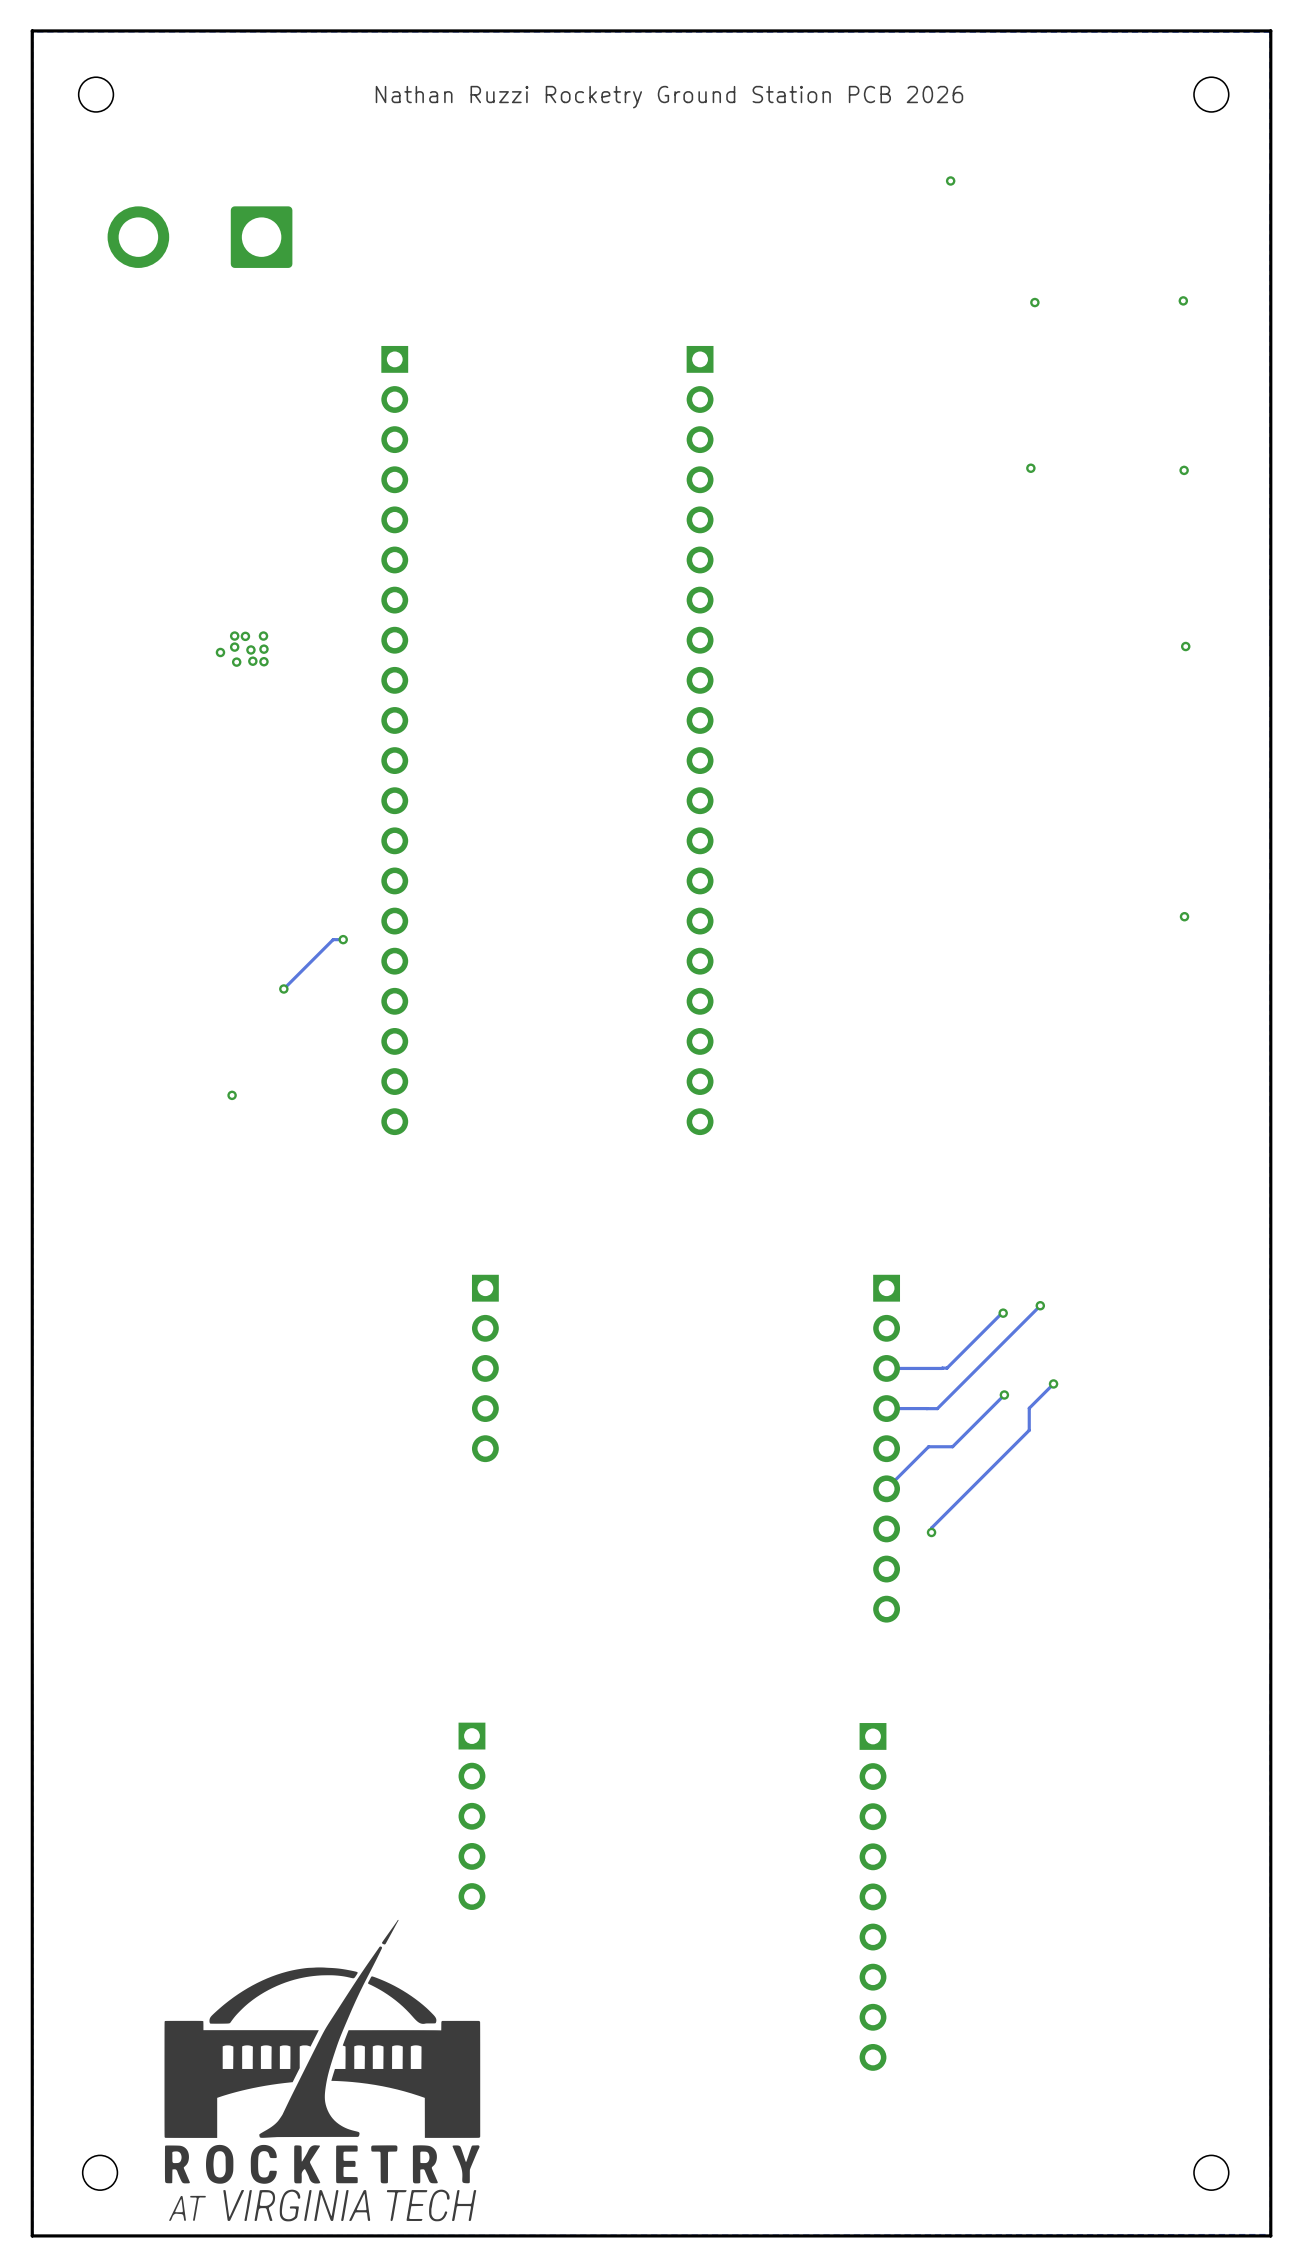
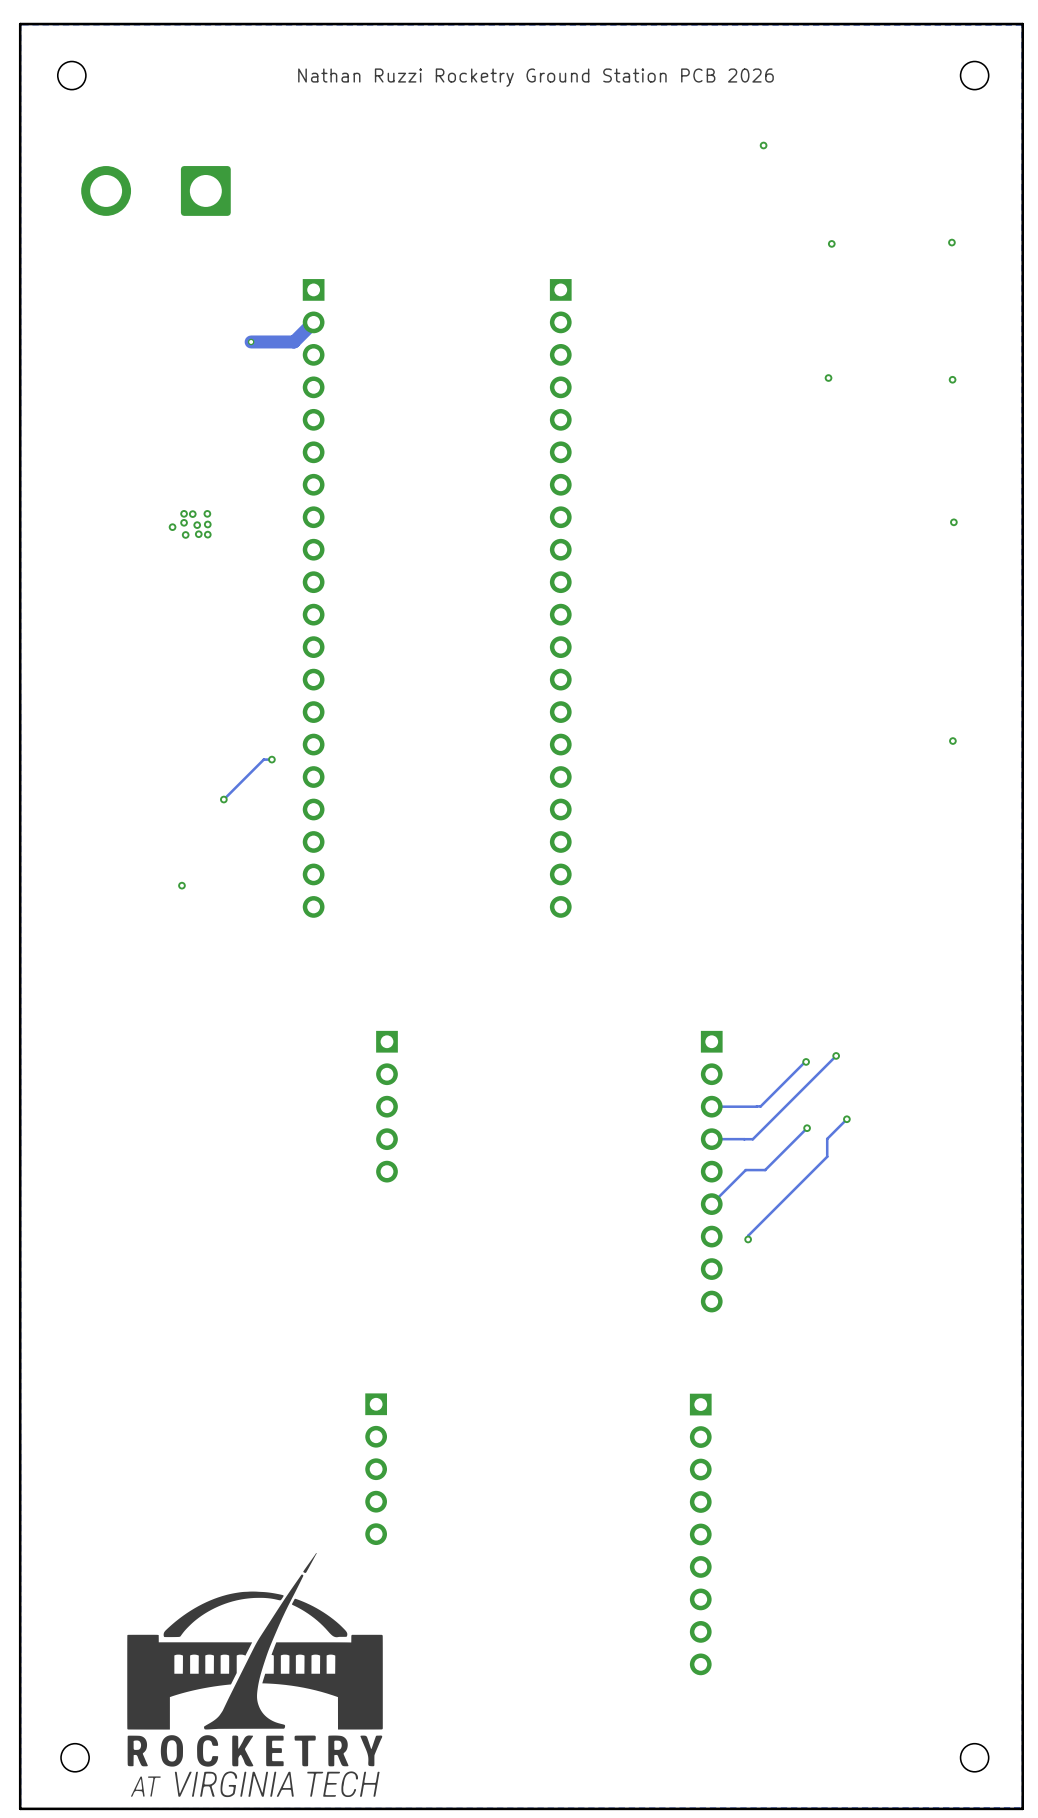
track: none -> (313, 322) (294, 341) (251, 341)
via: none -> (251, 341)

